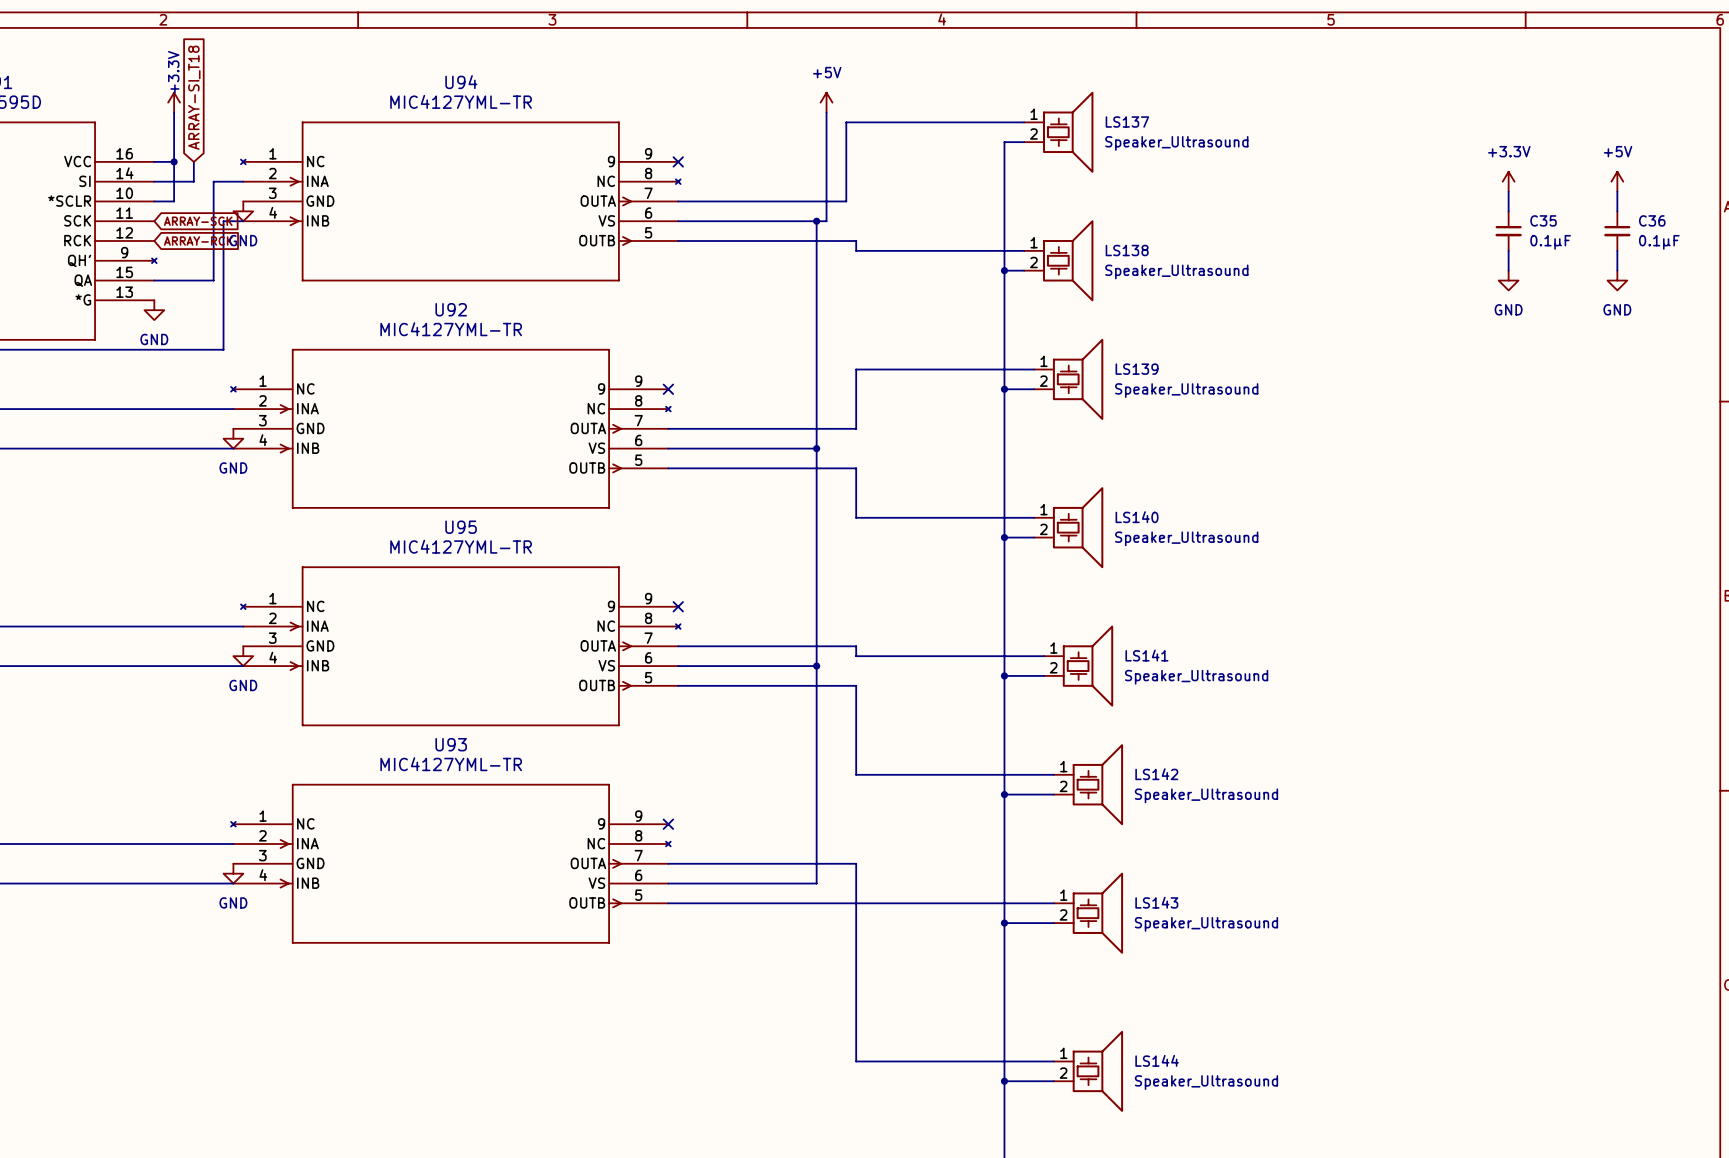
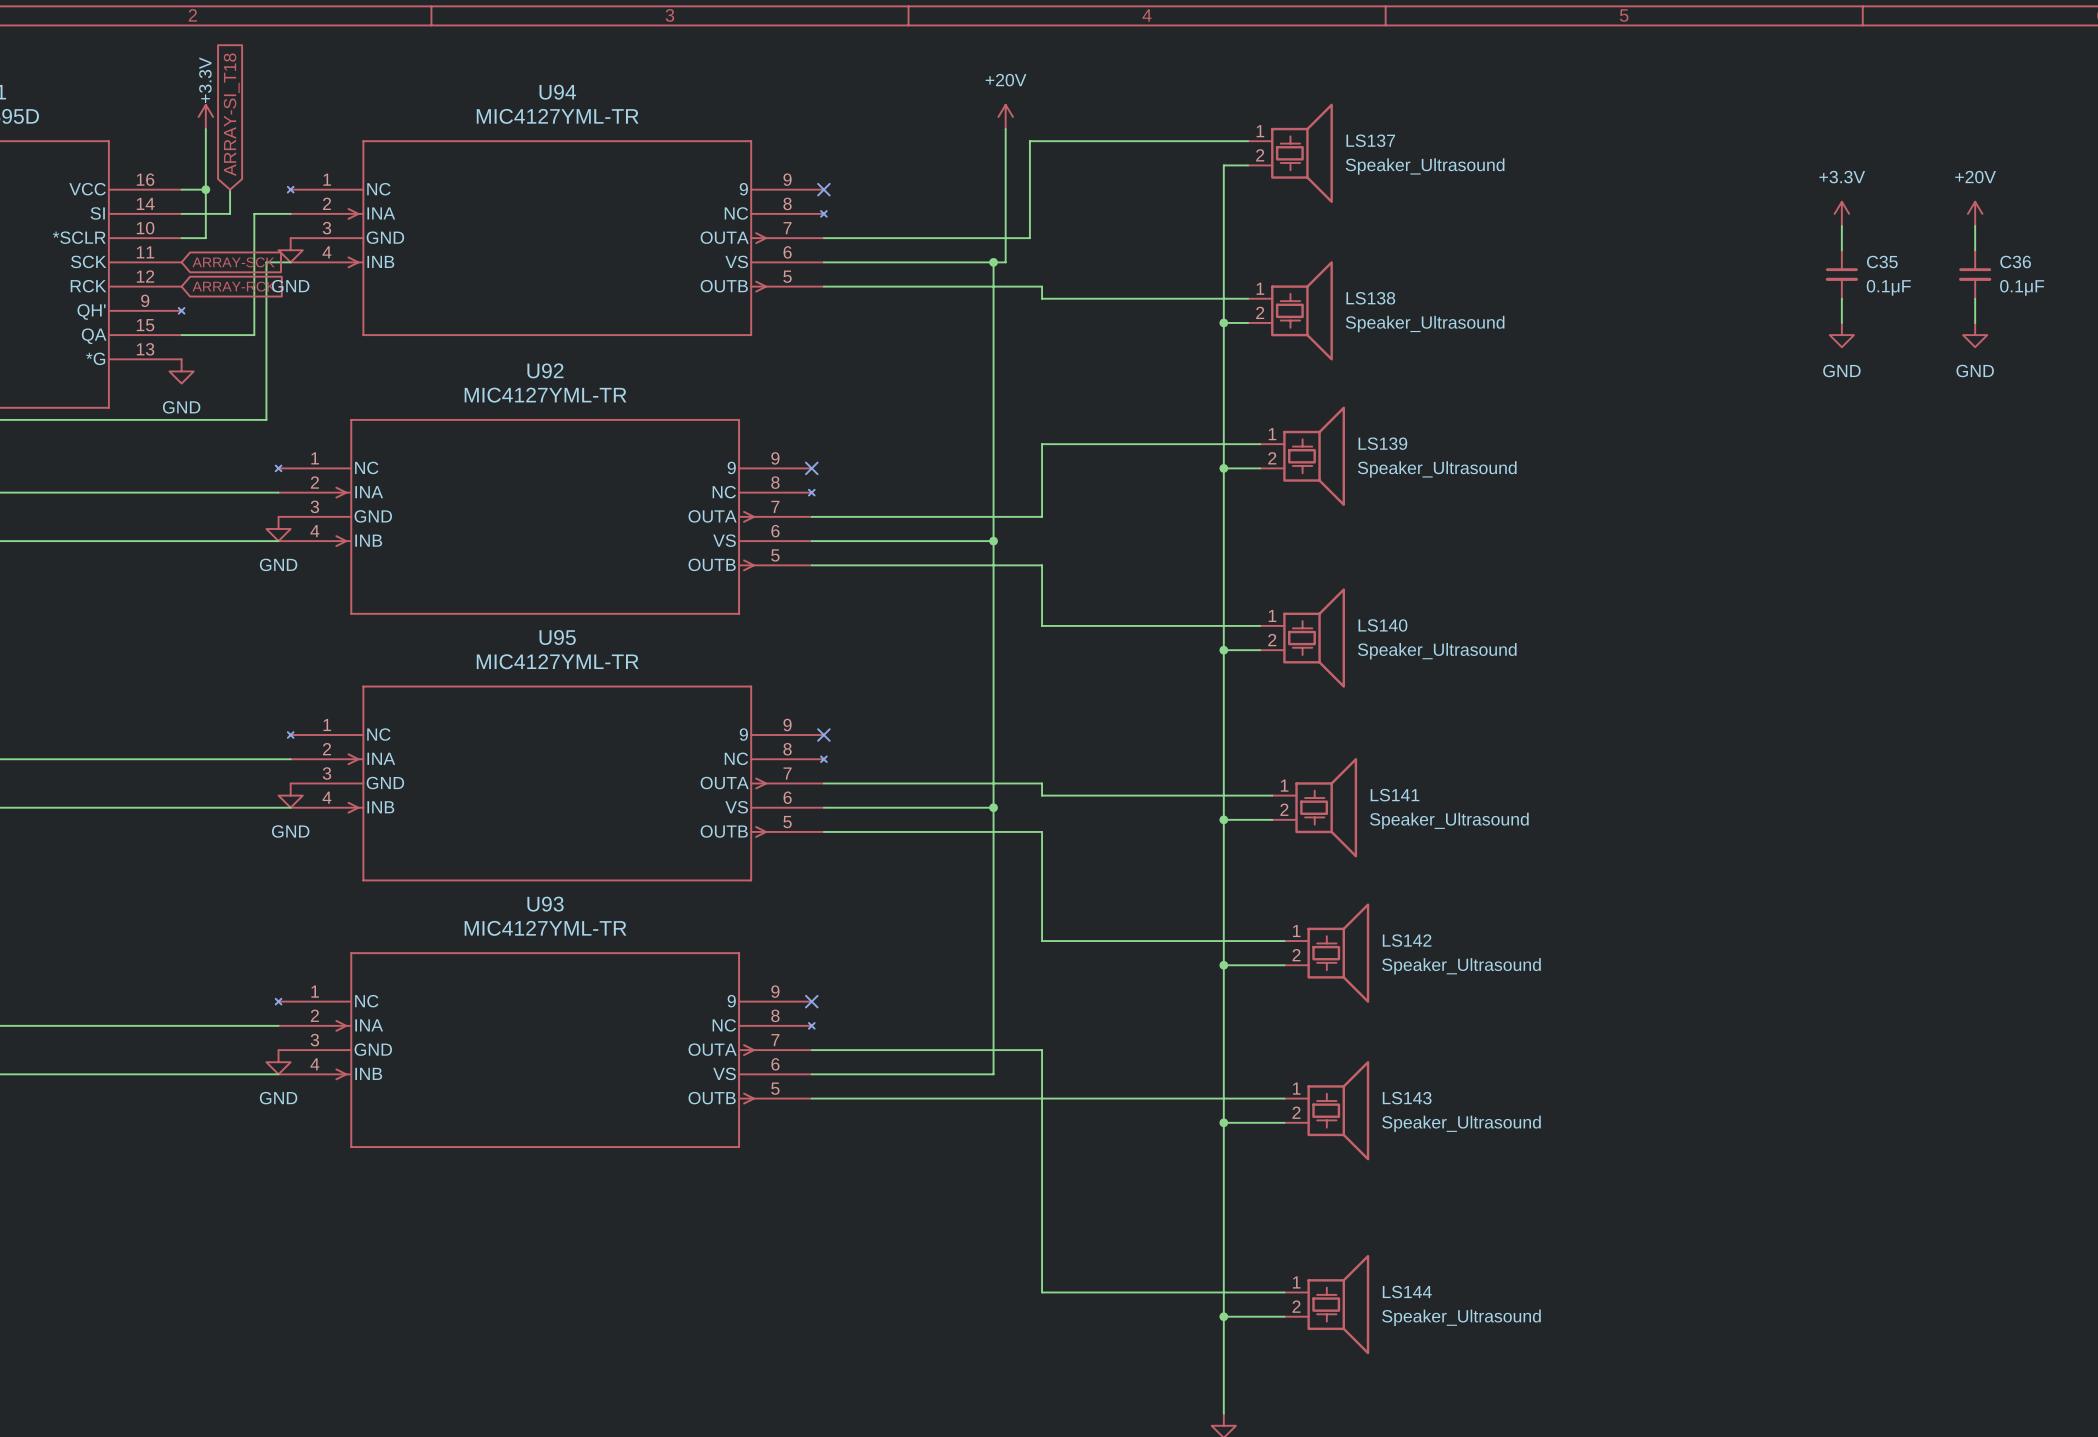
power symbol: +5V (826, 102) -> +20V (1005, 116)
power symbol: +5V (1617, 181) -> +20V (1975, 213)

